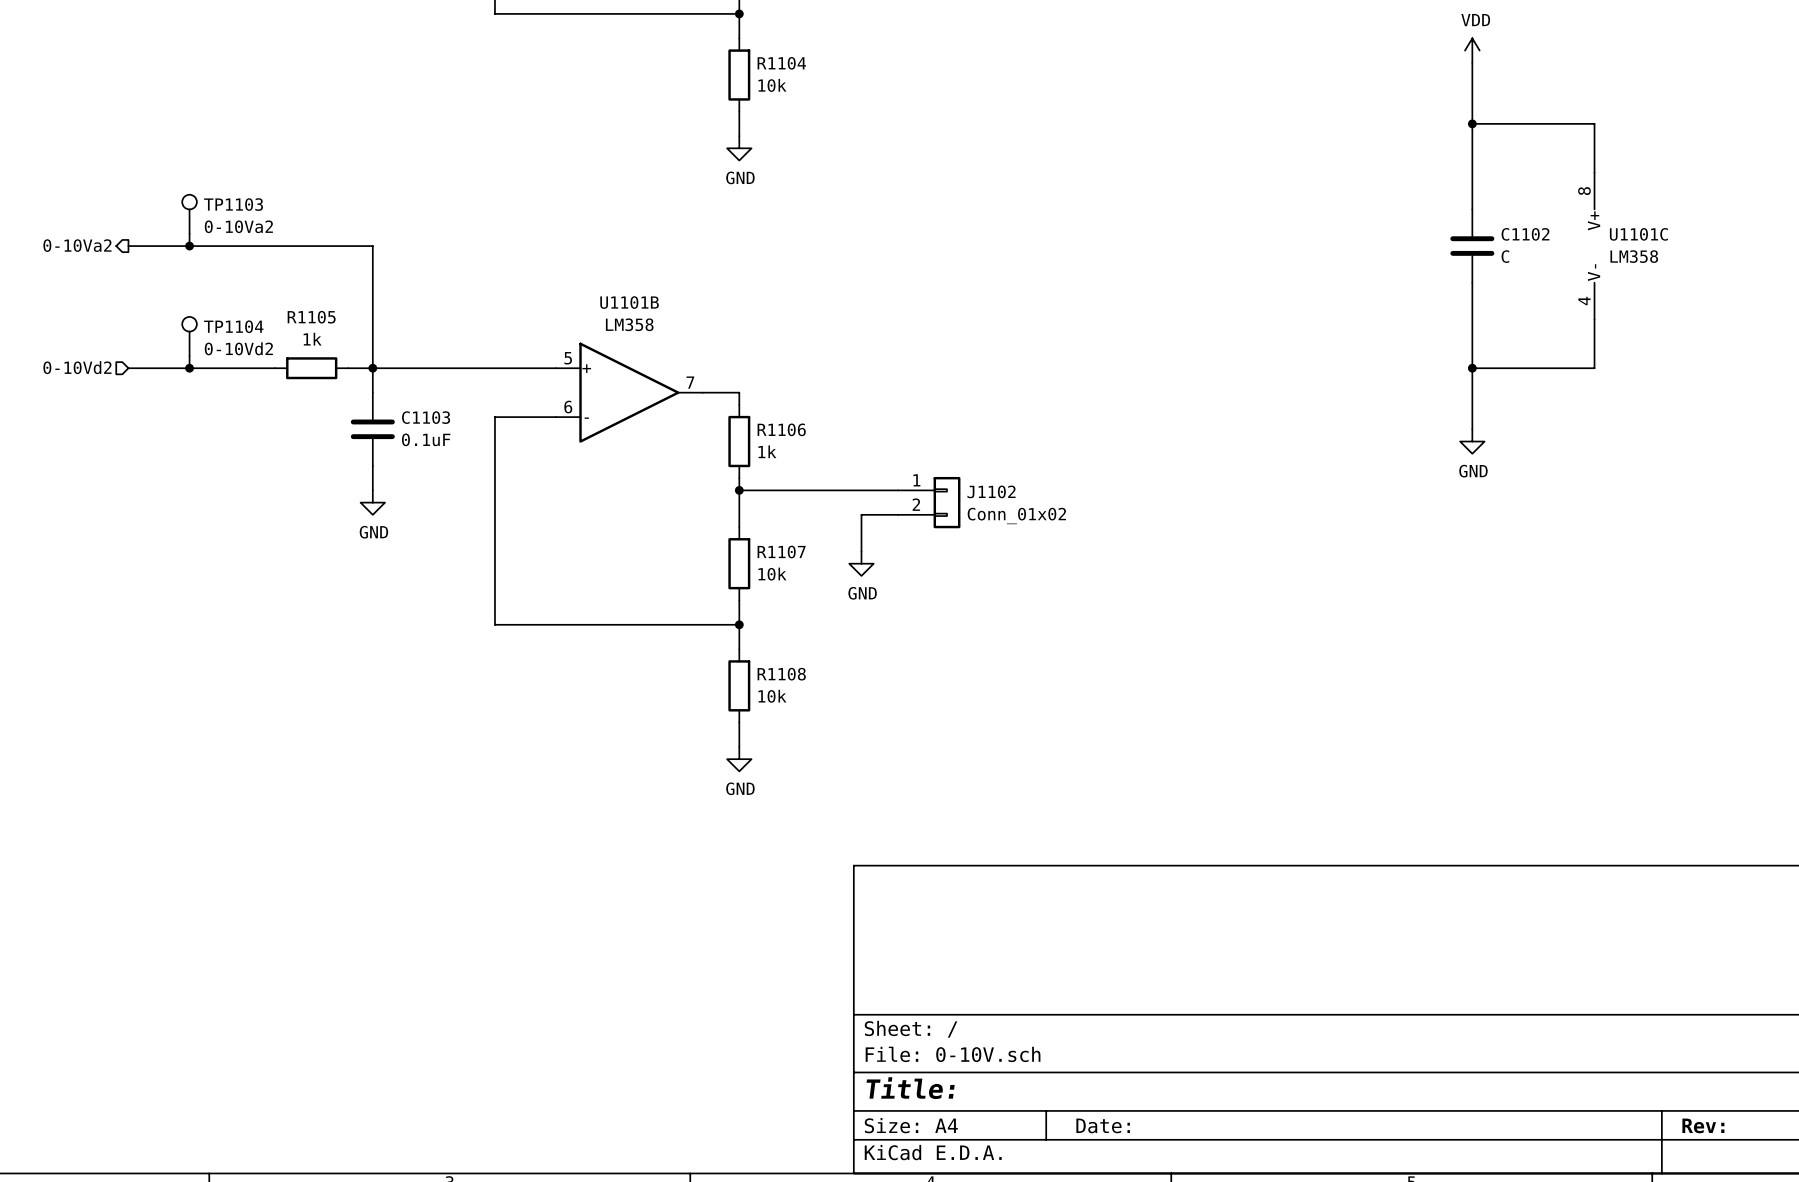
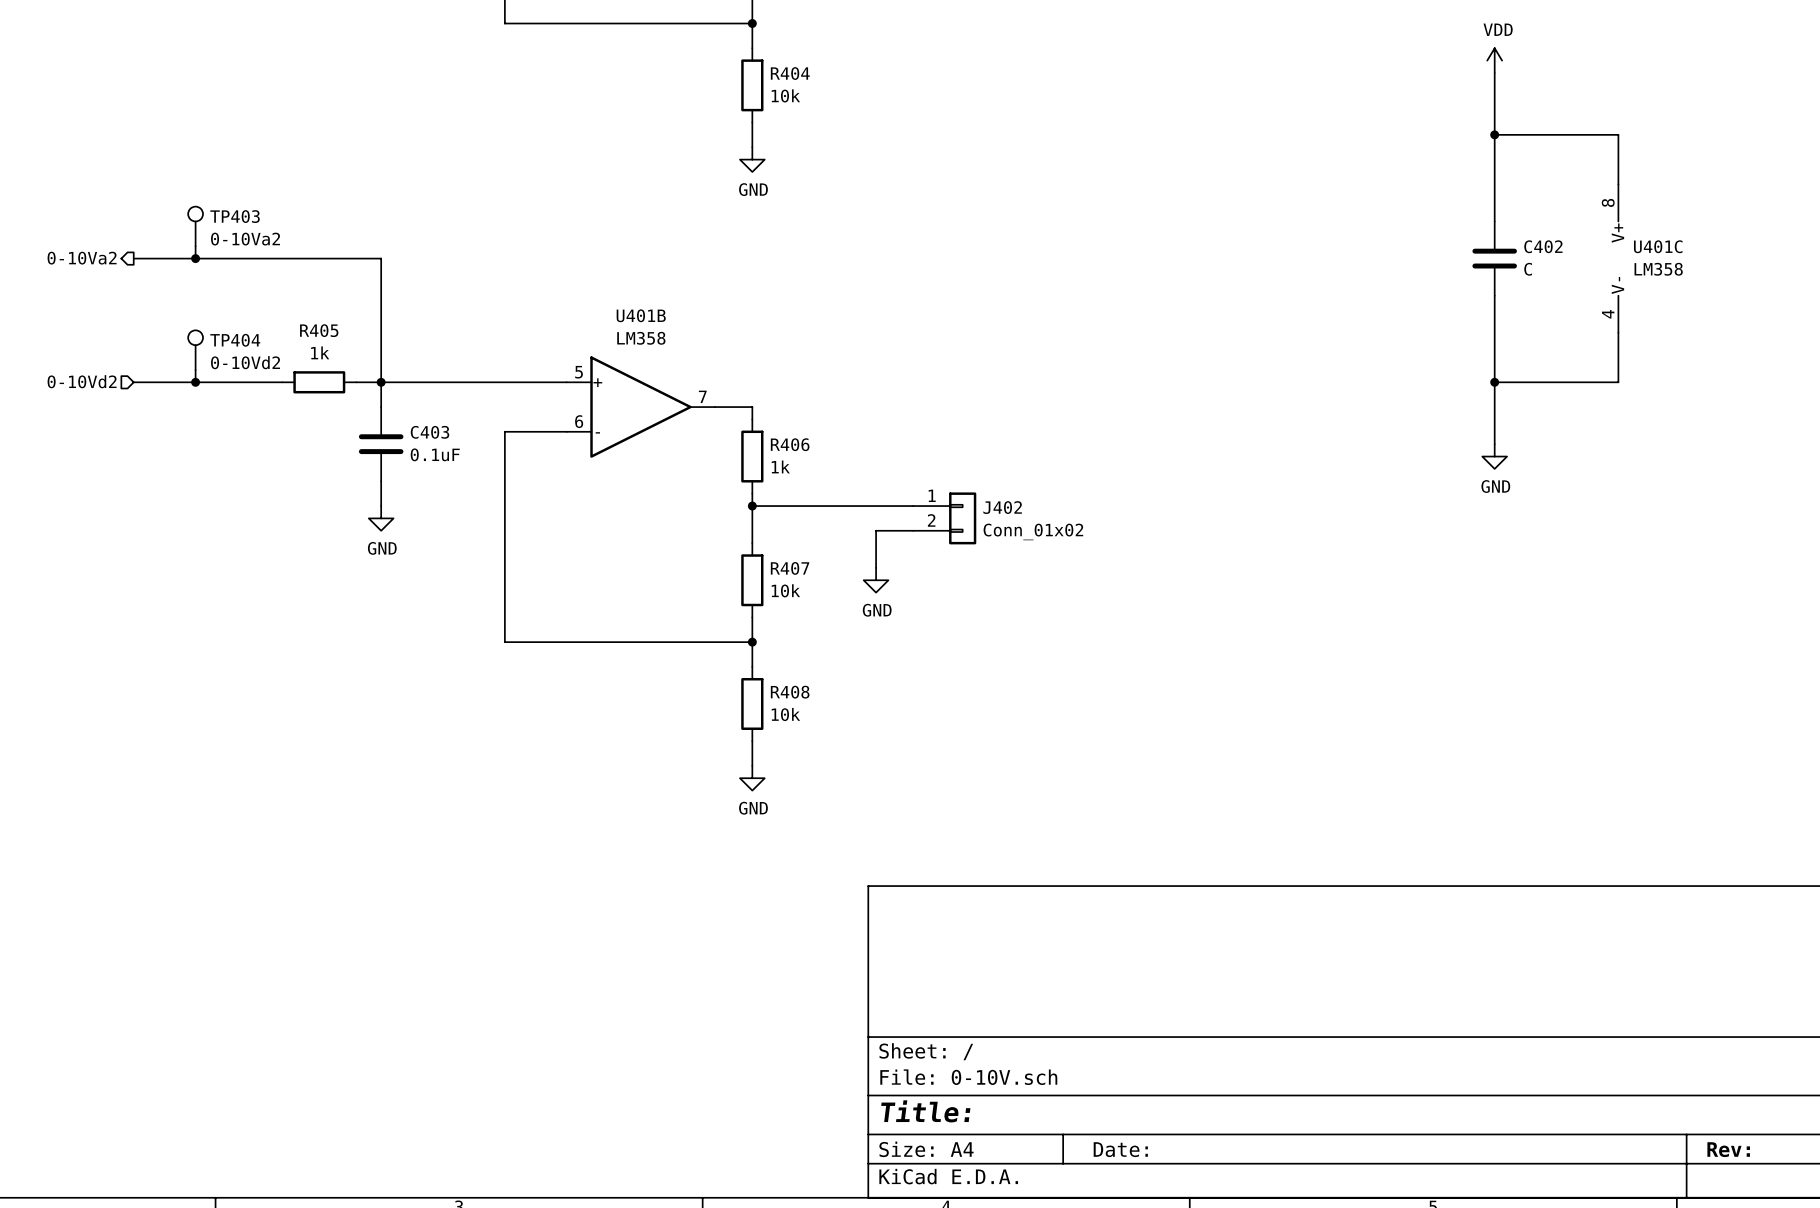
R1104 name: R1104 (781, 63) -> R404 (790, 73)
TP1103 name: TP1103 (233, 204) -> TP403 (235, 216)
C1102 name: C1102 (1525, 234) -> C402 (1543, 246)
U1101C name: U1101C (1638, 234) -> U401C (1658, 246)
U1101B name: U1101B (629, 302) -> U401B (641, 315)
R1105 name: R1105 (311, 317) -> R405 (319, 330)
TP1104 name: TP1104 (233, 326) -> TP404 (235, 340)
C1103 name: C1103 (426, 417) -> C403 (430, 432)
R1106 name: R1106 (781, 429) -> R406 (790, 444)
J1102 name: J1102 (991, 491) -> J402 (1002, 507)
R1107 name: R1107 (781, 552) -> R407 (790, 568)
R1108 name: R1108 (781, 674) -> R408 (790, 692)

